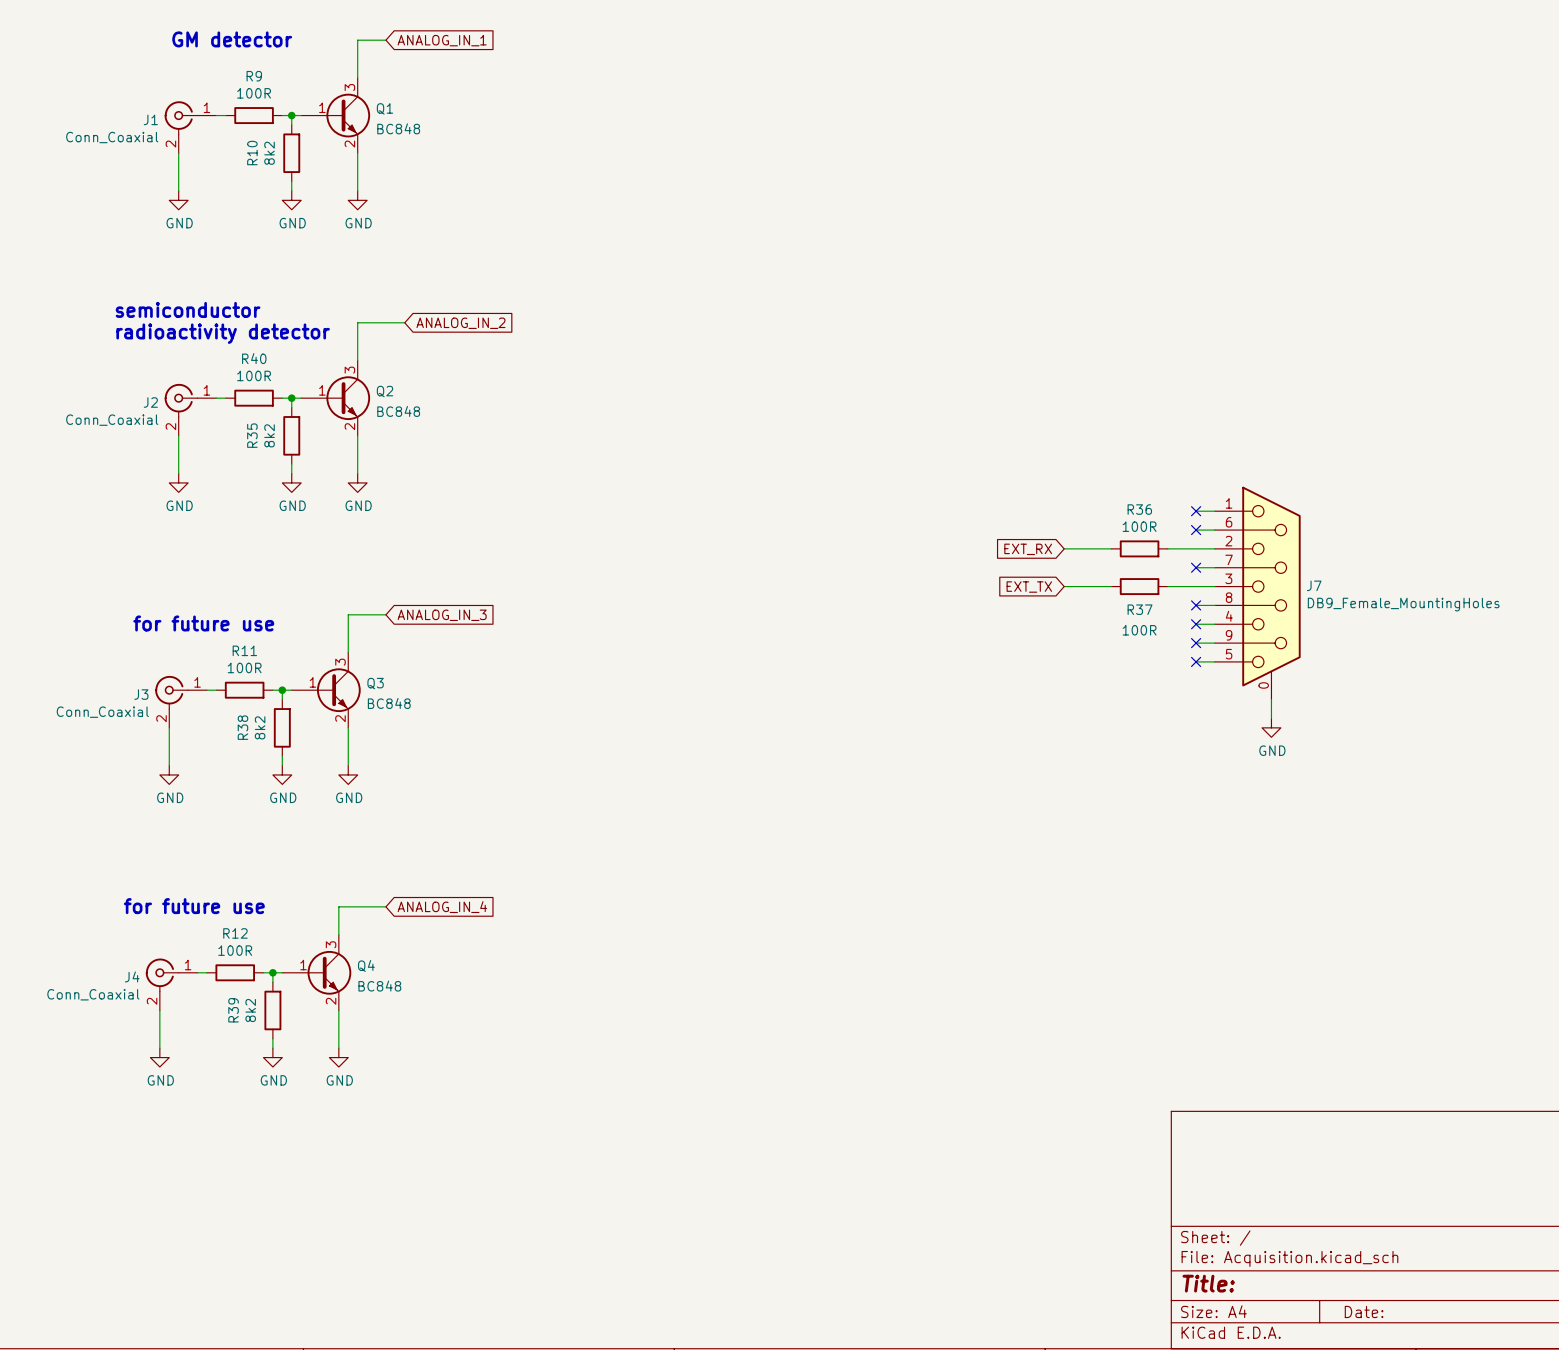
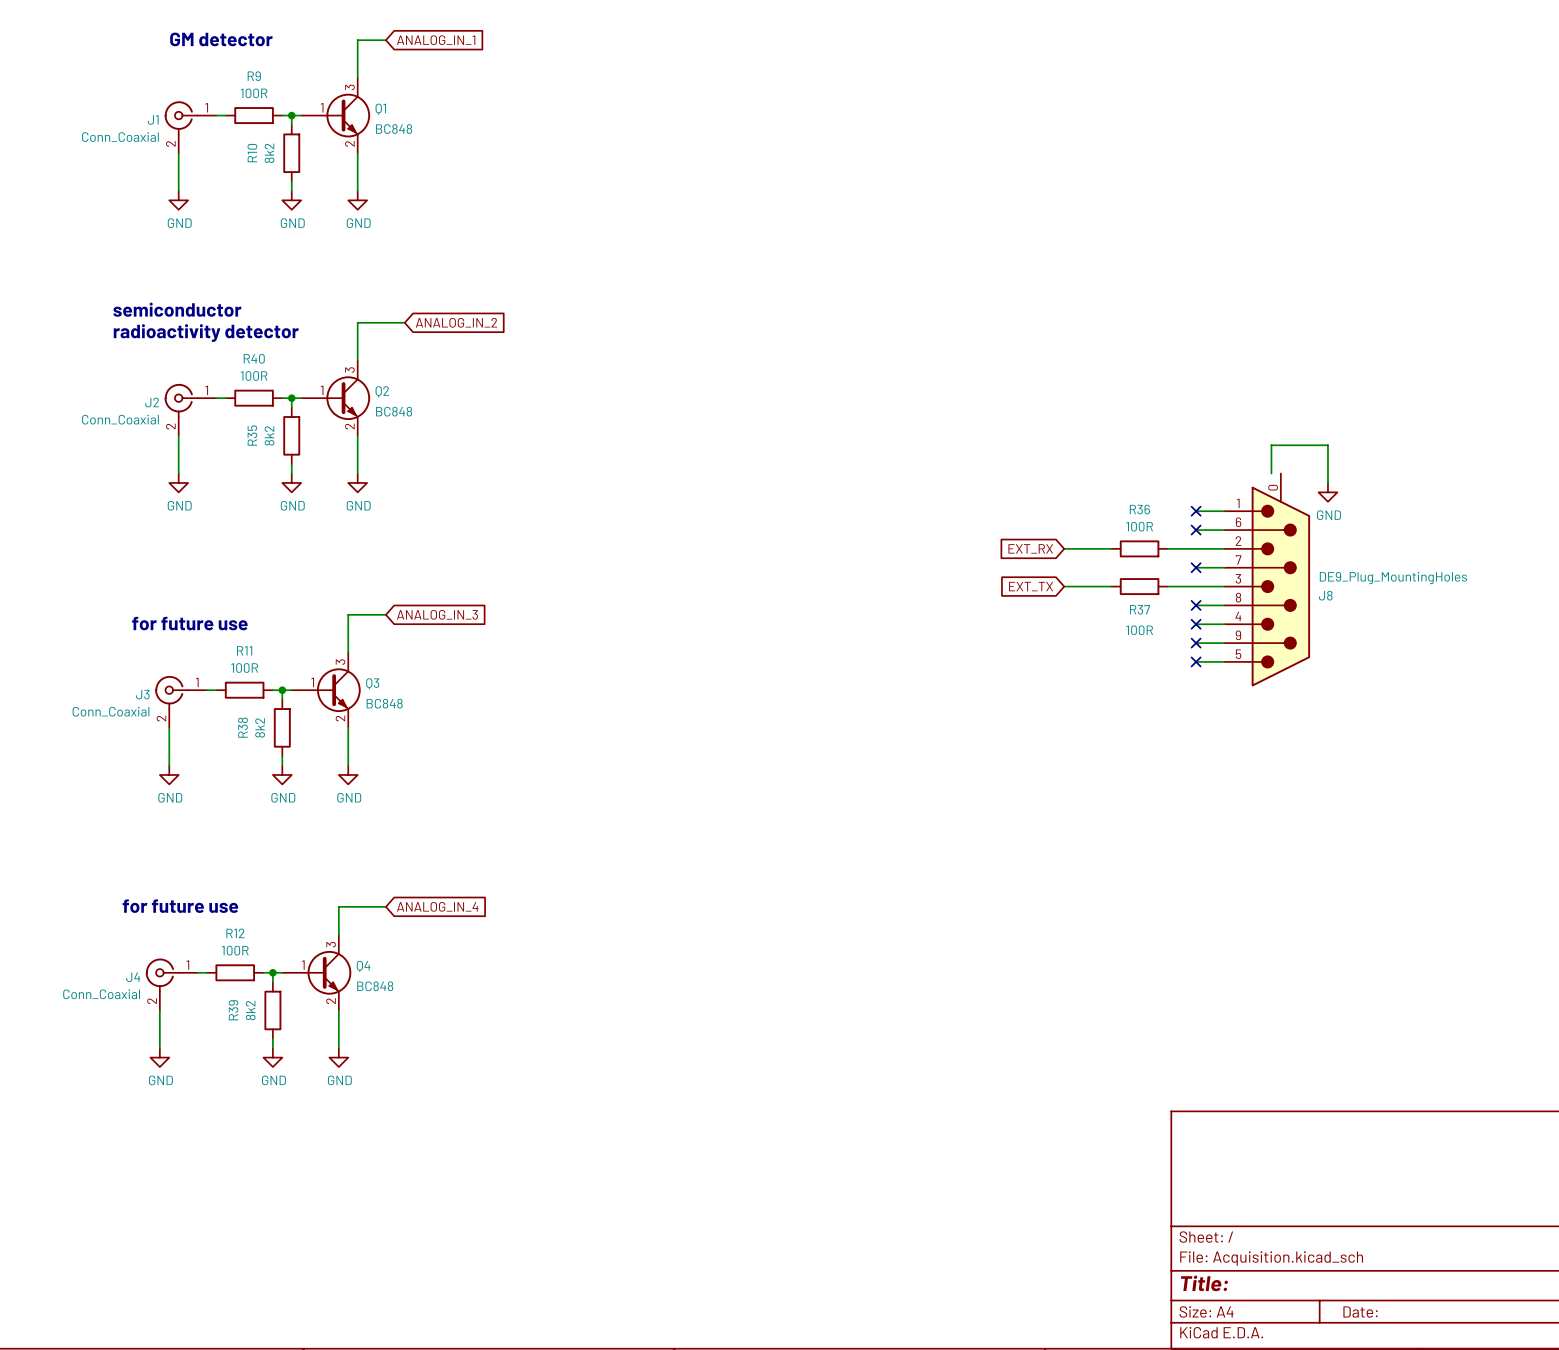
wire: none -> (1271, 473) (1271, 445) (1327, 445) (1327, 482)
power symbol: none -> GND (1327, 492)
J8: none -> DE9_Plug_MountingHoles (1267, 579)
J7: DB9_Female_MountingHoles (1257, 593) -> none
wire: (1271, 699) (1271, 718) -> none
power symbol: GND (1271, 727) -> none

